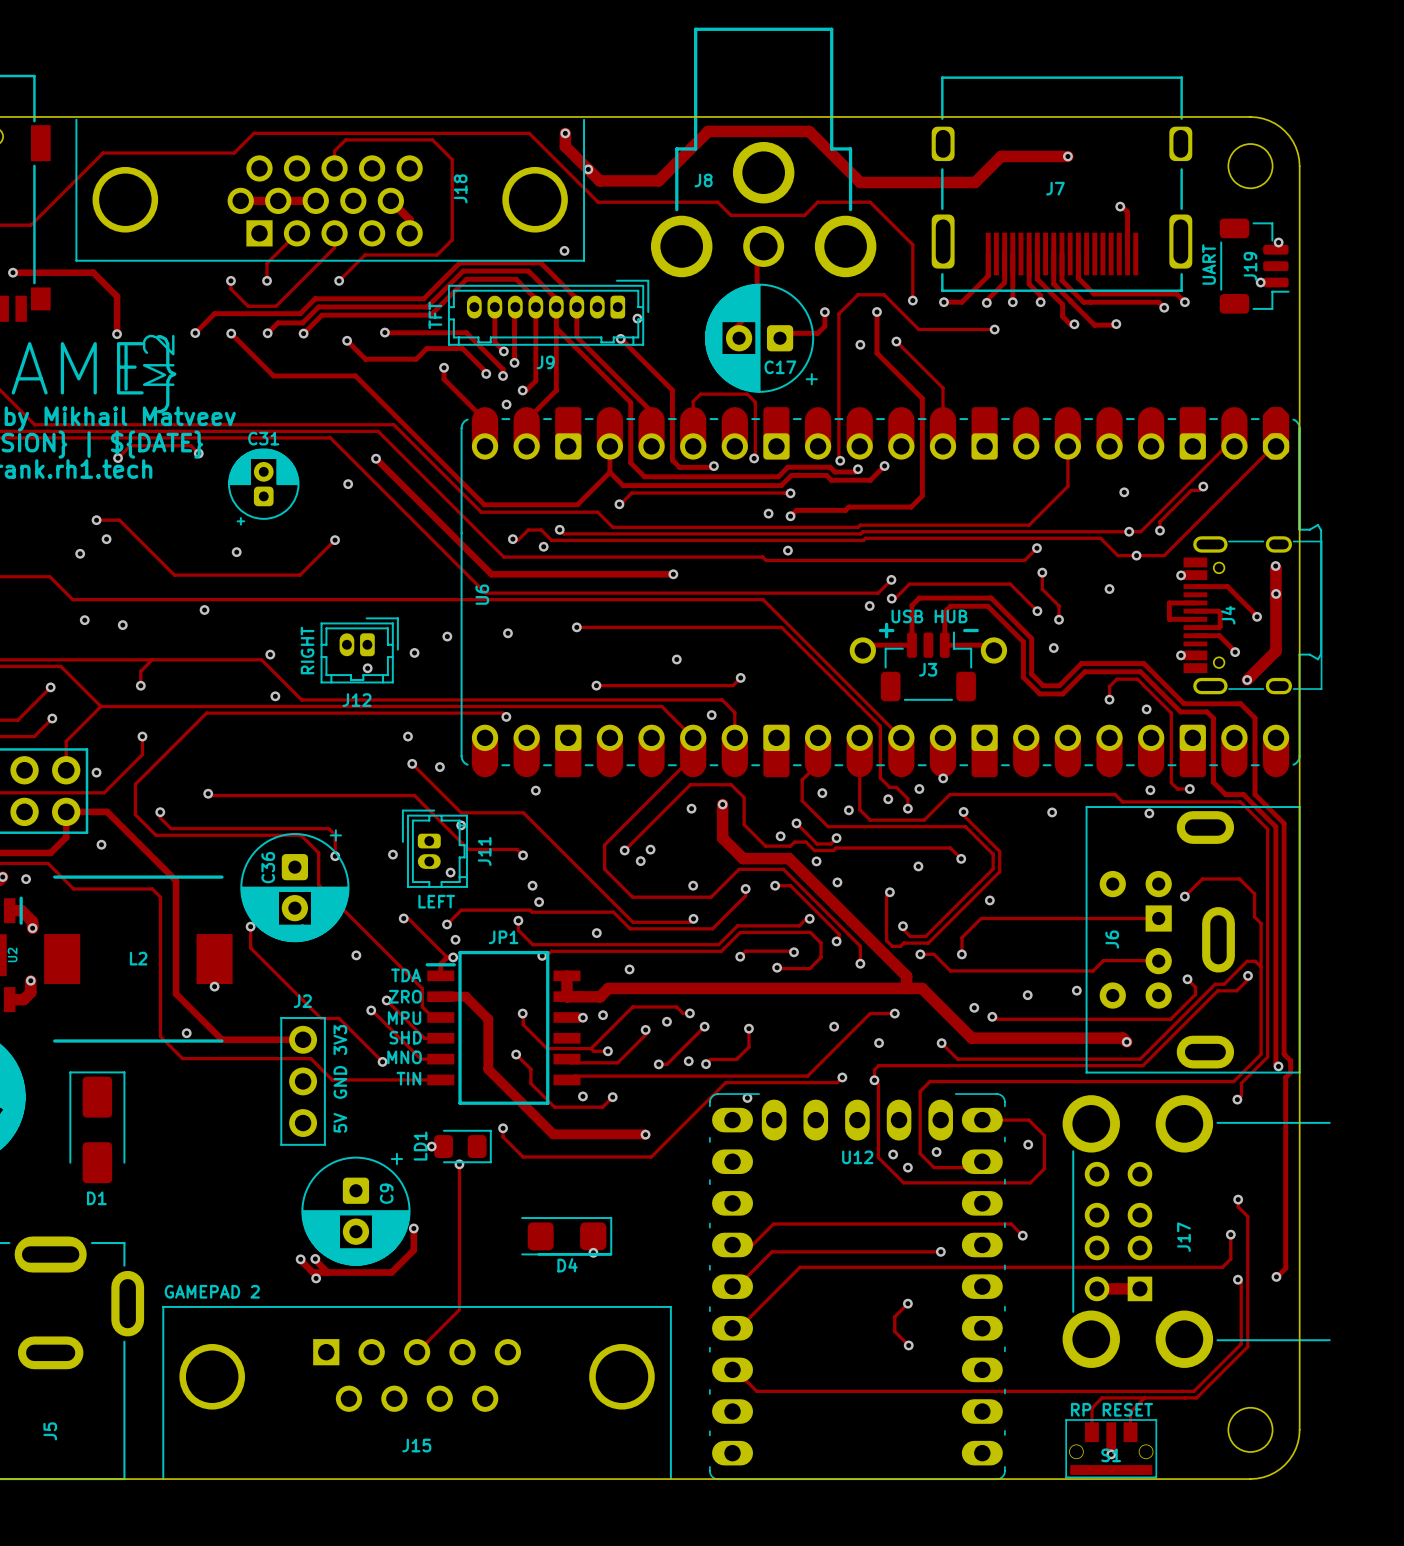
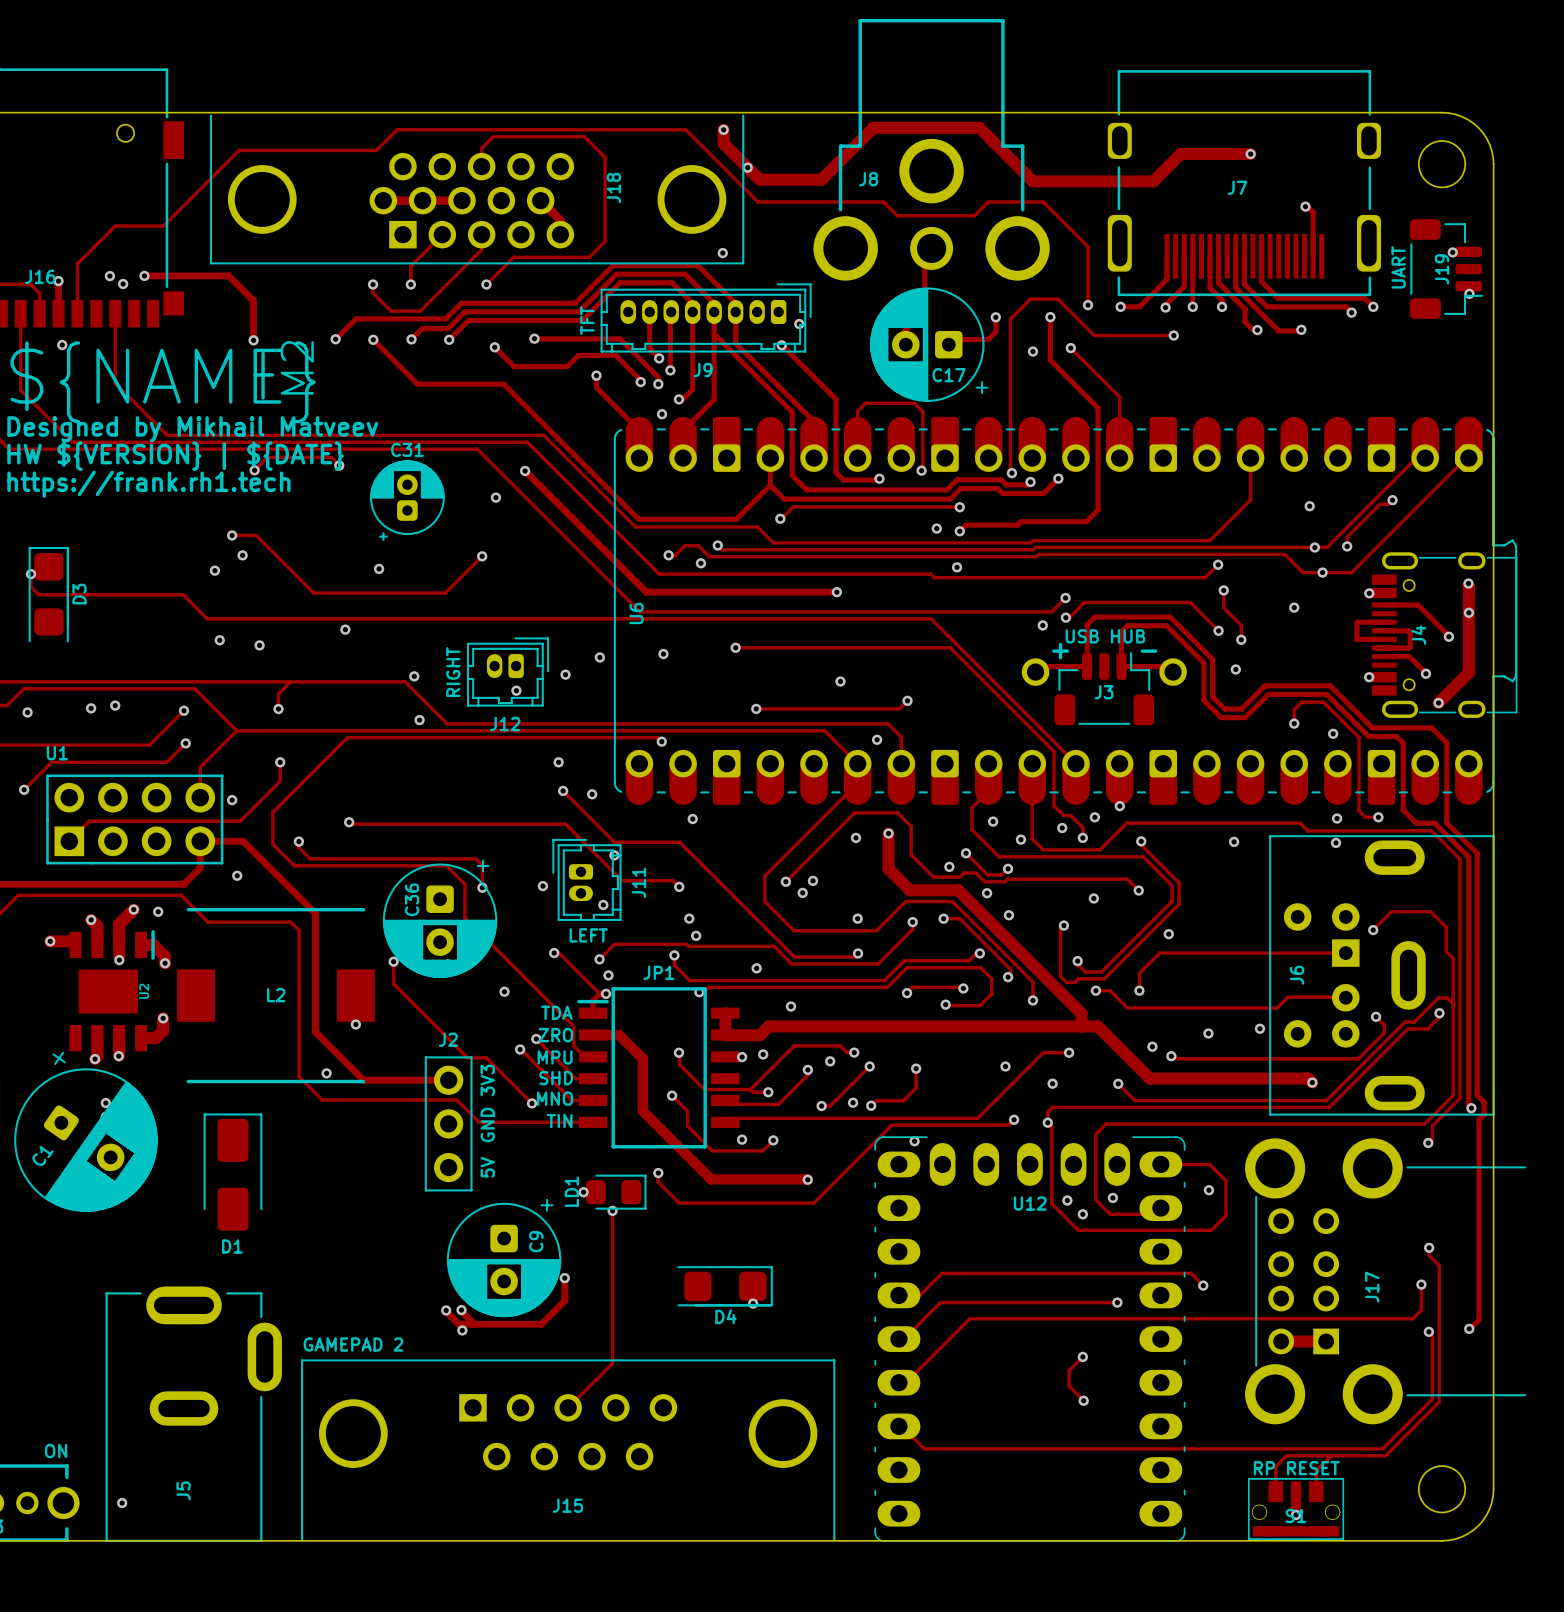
via: (1278, 242) -> none
via: none -> (1452, 252)
via: (1260, 282) -> none
via: none -> (1469, 293)

